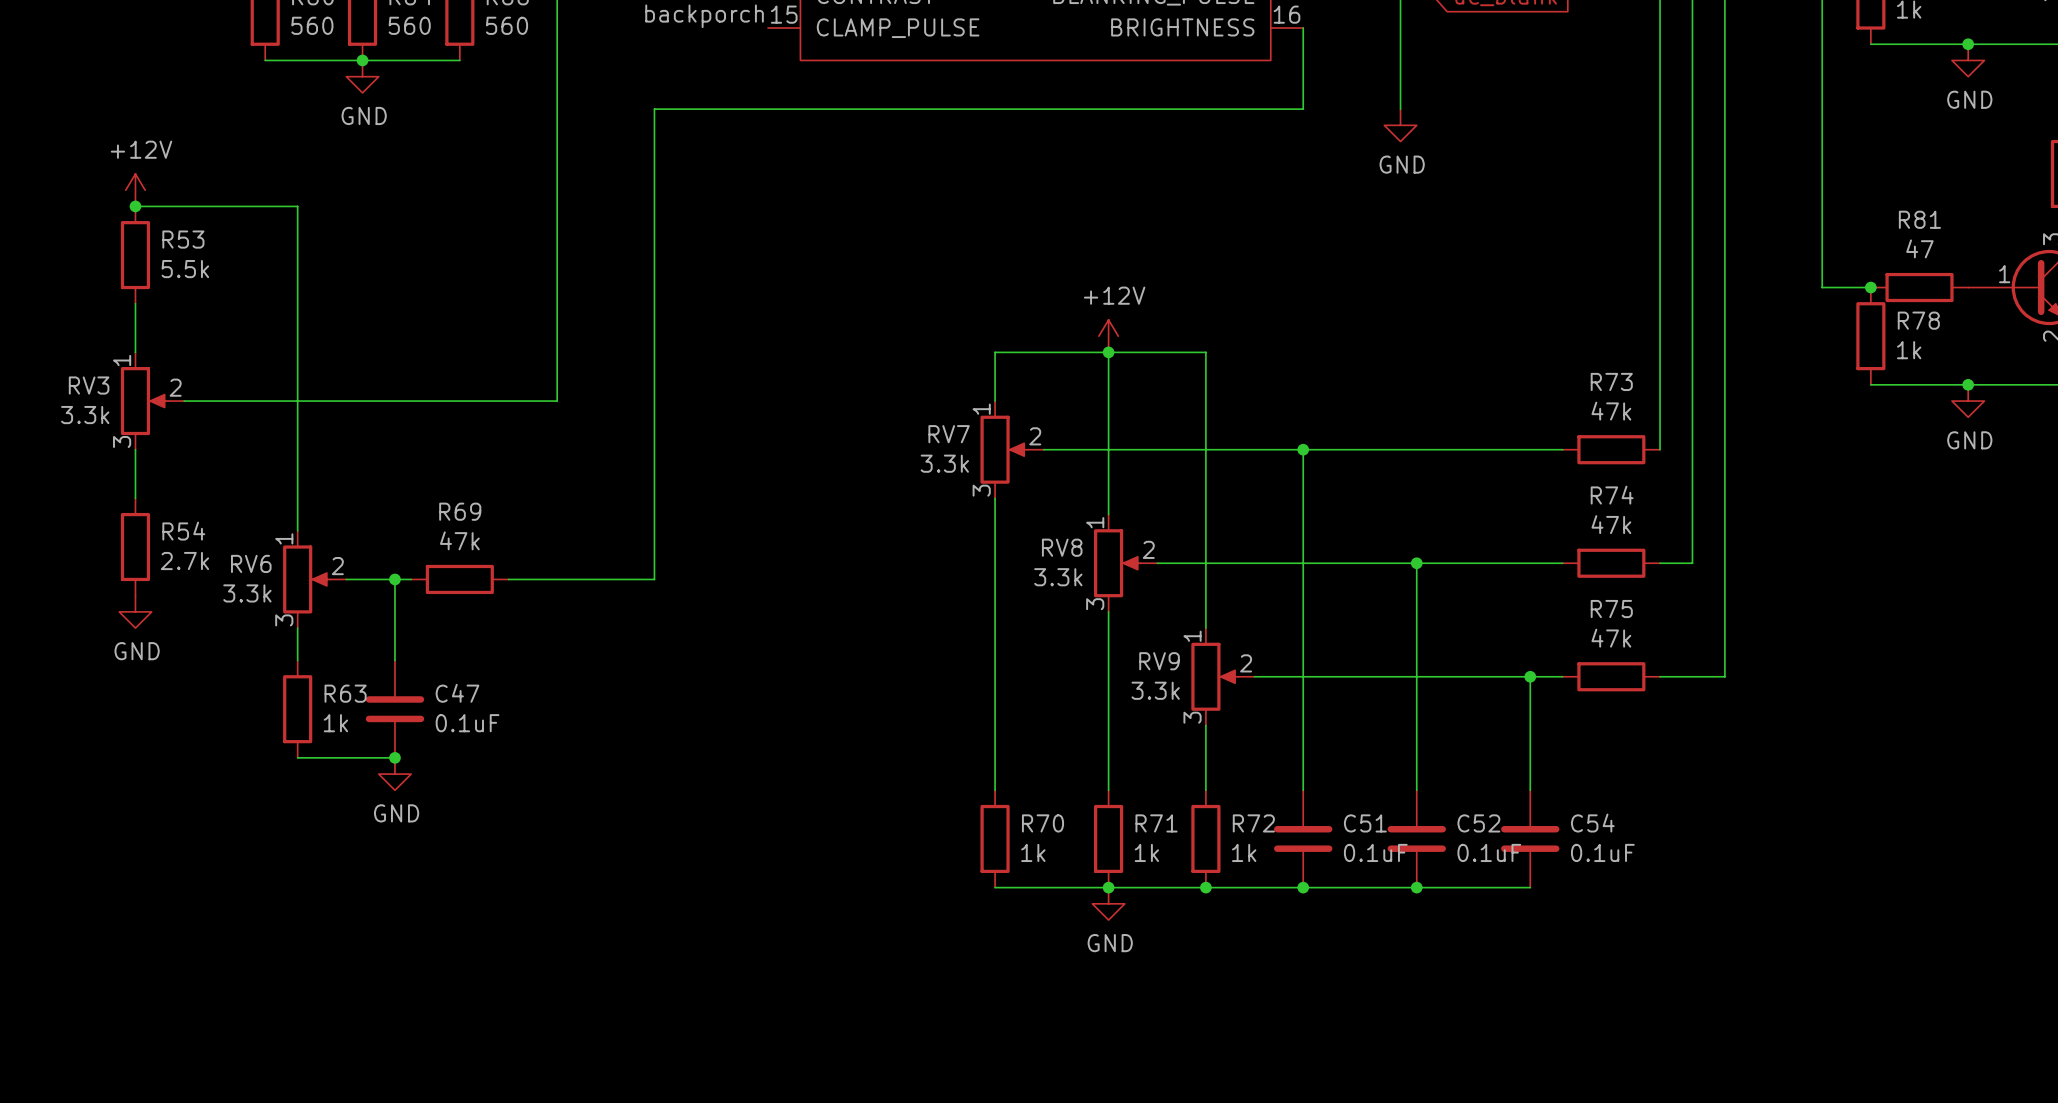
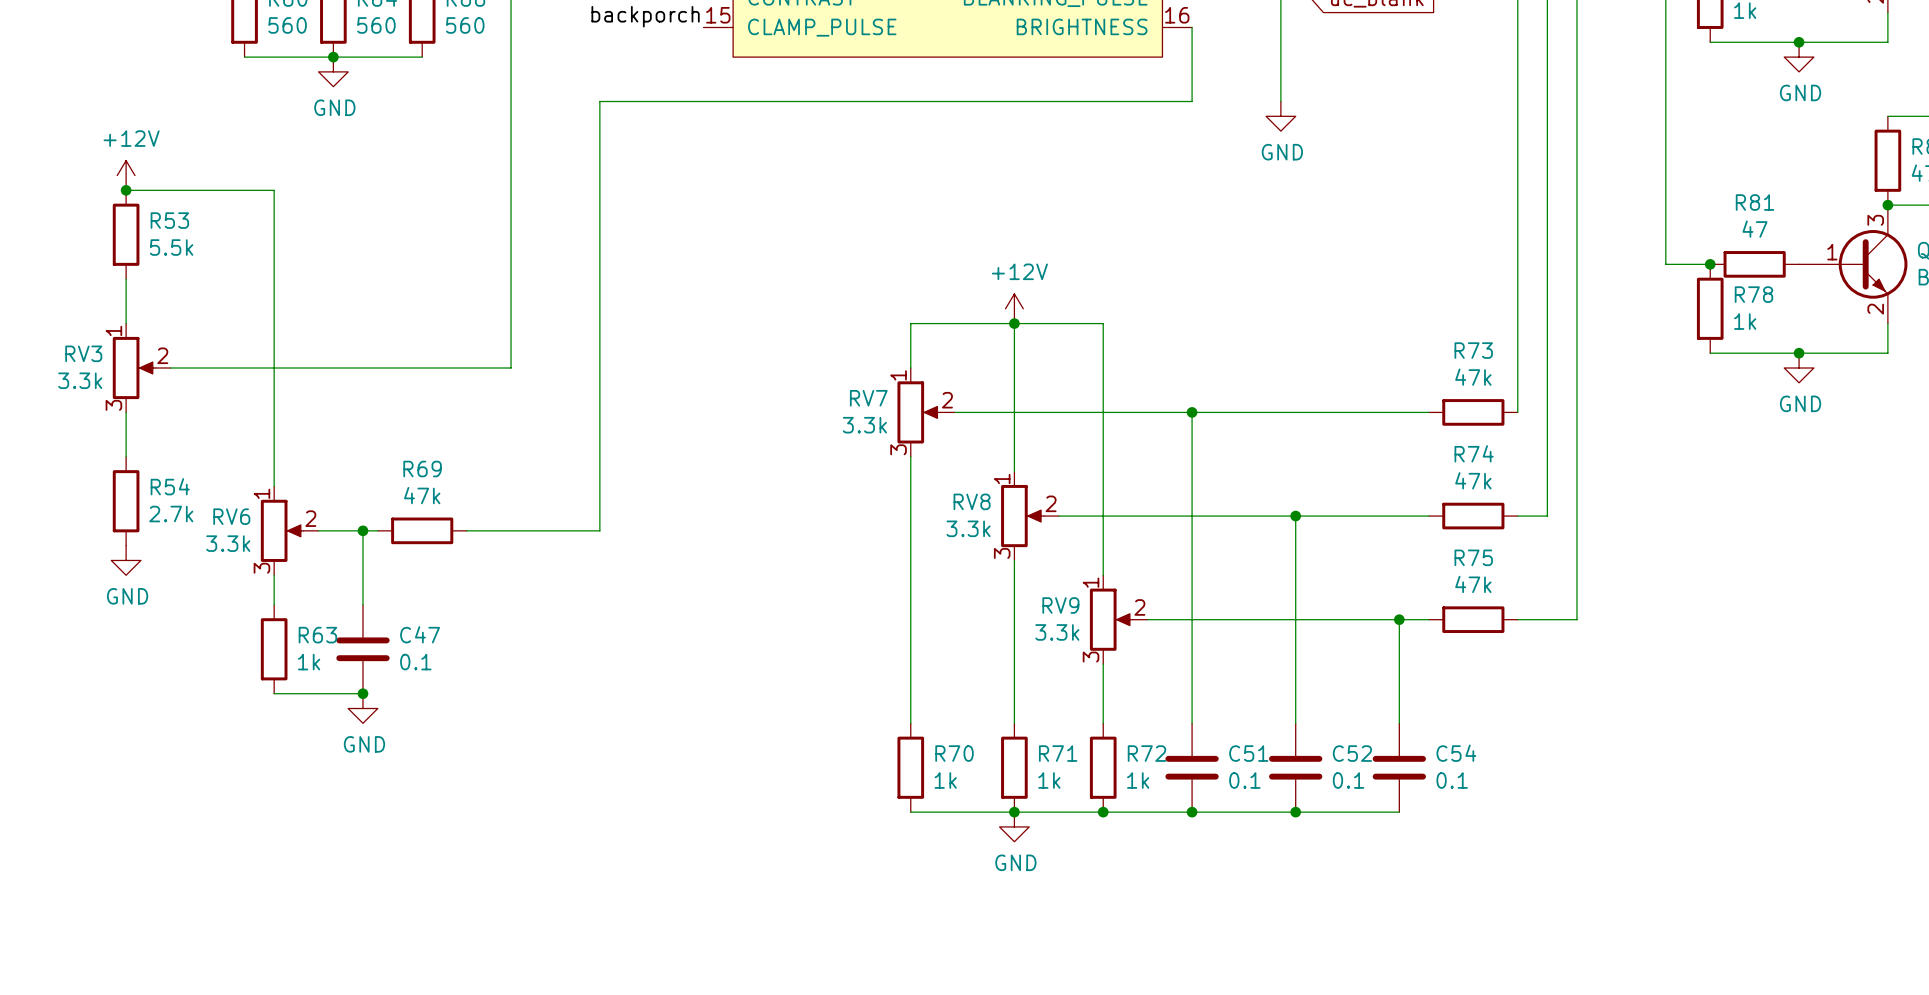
C47 value: 0.1uF (467, 723) -> 0.1 (415, 662)
C51 value: 0.1uF (1375, 852) -> 0.1 (1244, 780)
C52 value: 0.1uF (1489, 852) -> 0.1 (1348, 780)
C54 value: 0.1uF (1602, 852) -> 0.1 (1452, 780)

